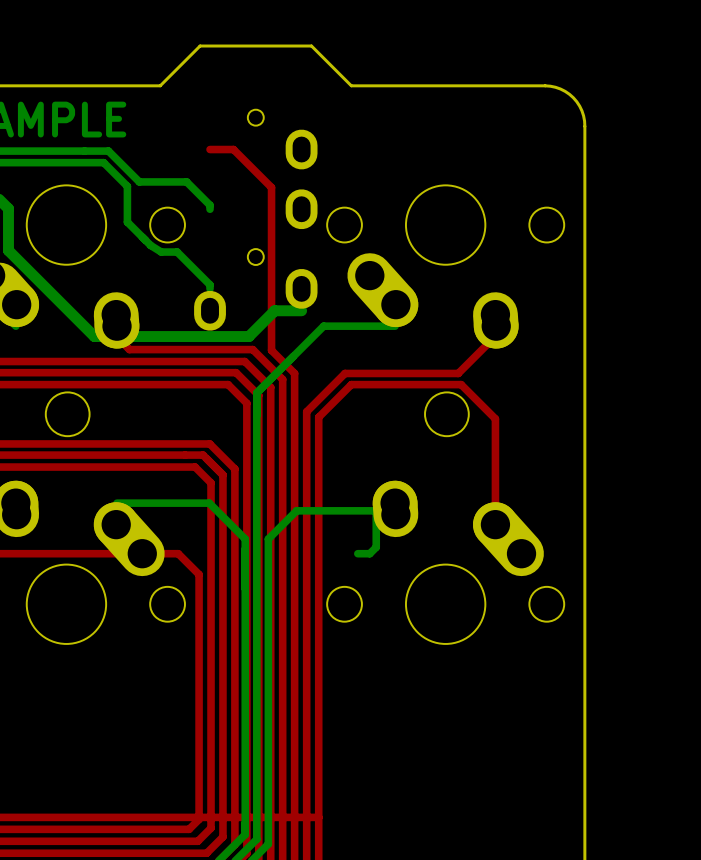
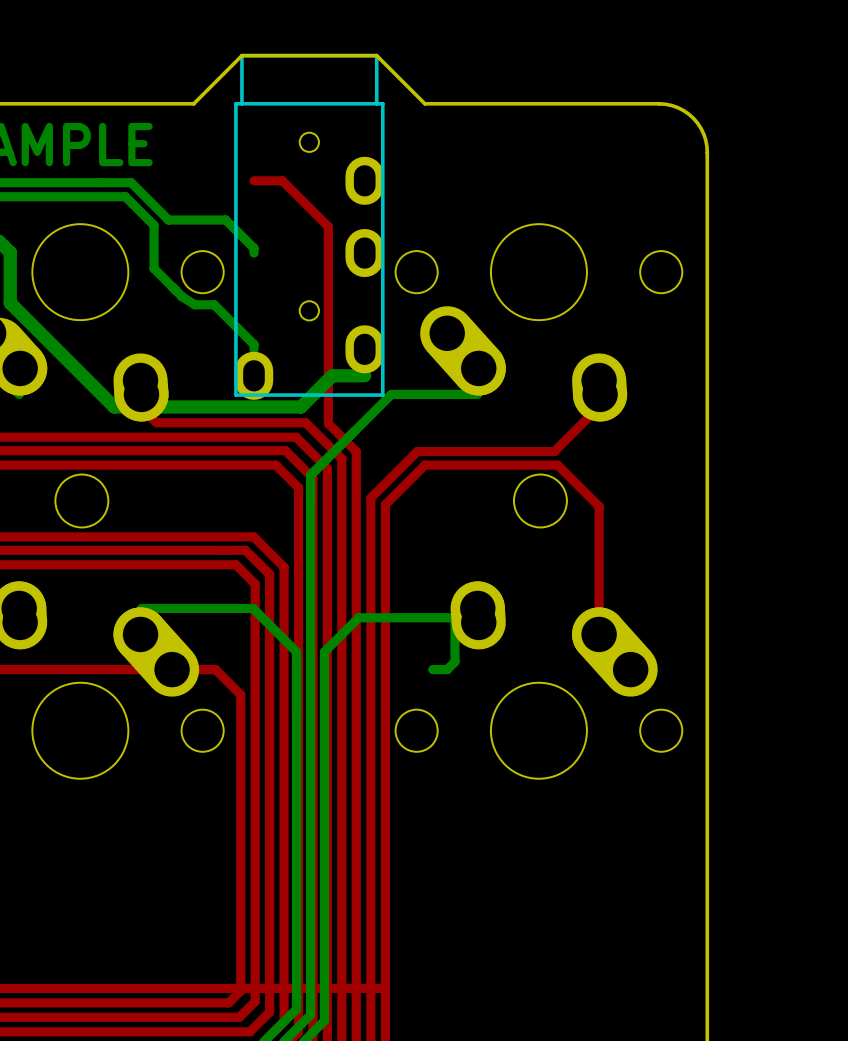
part: none -> (309, 226)
part: (255, 220) -> none

